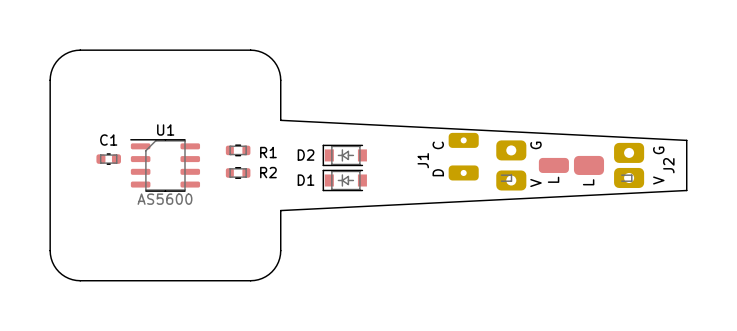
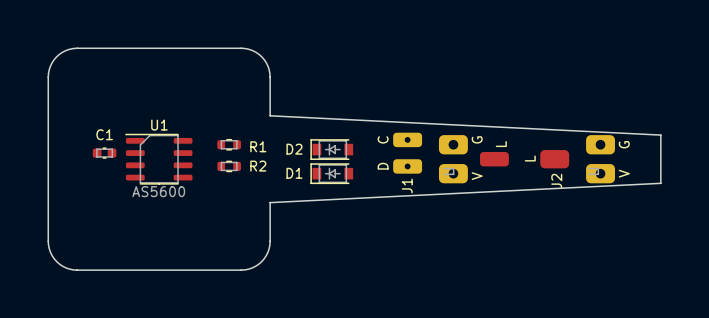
J1 footprint: [448, 132, 569, 191] -> [393, 132, 509, 184]
J2 footprint: [573, 142, 645, 189] -> [540, 135, 616, 184]
J1 name position: J1 (423, 160) -> J1 (407, 185)
J2 name position: J2 (668, 165) -> J2 (556, 181)

